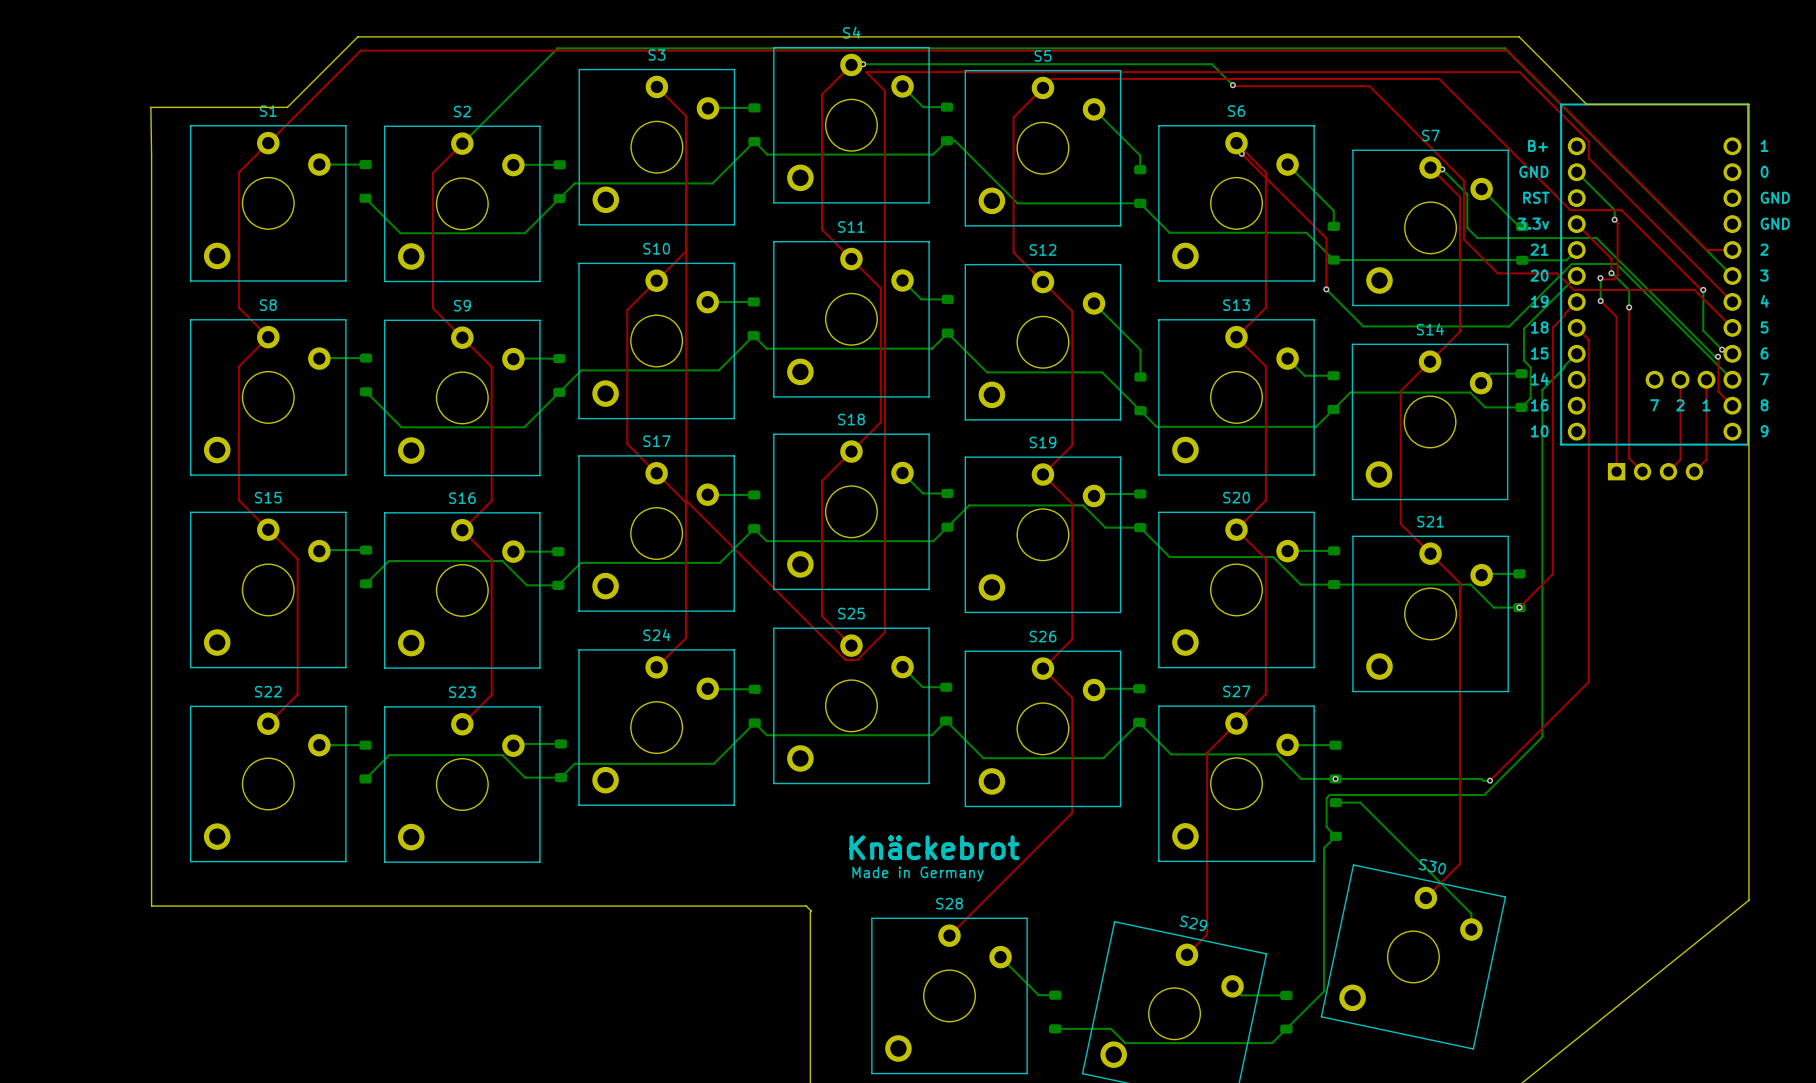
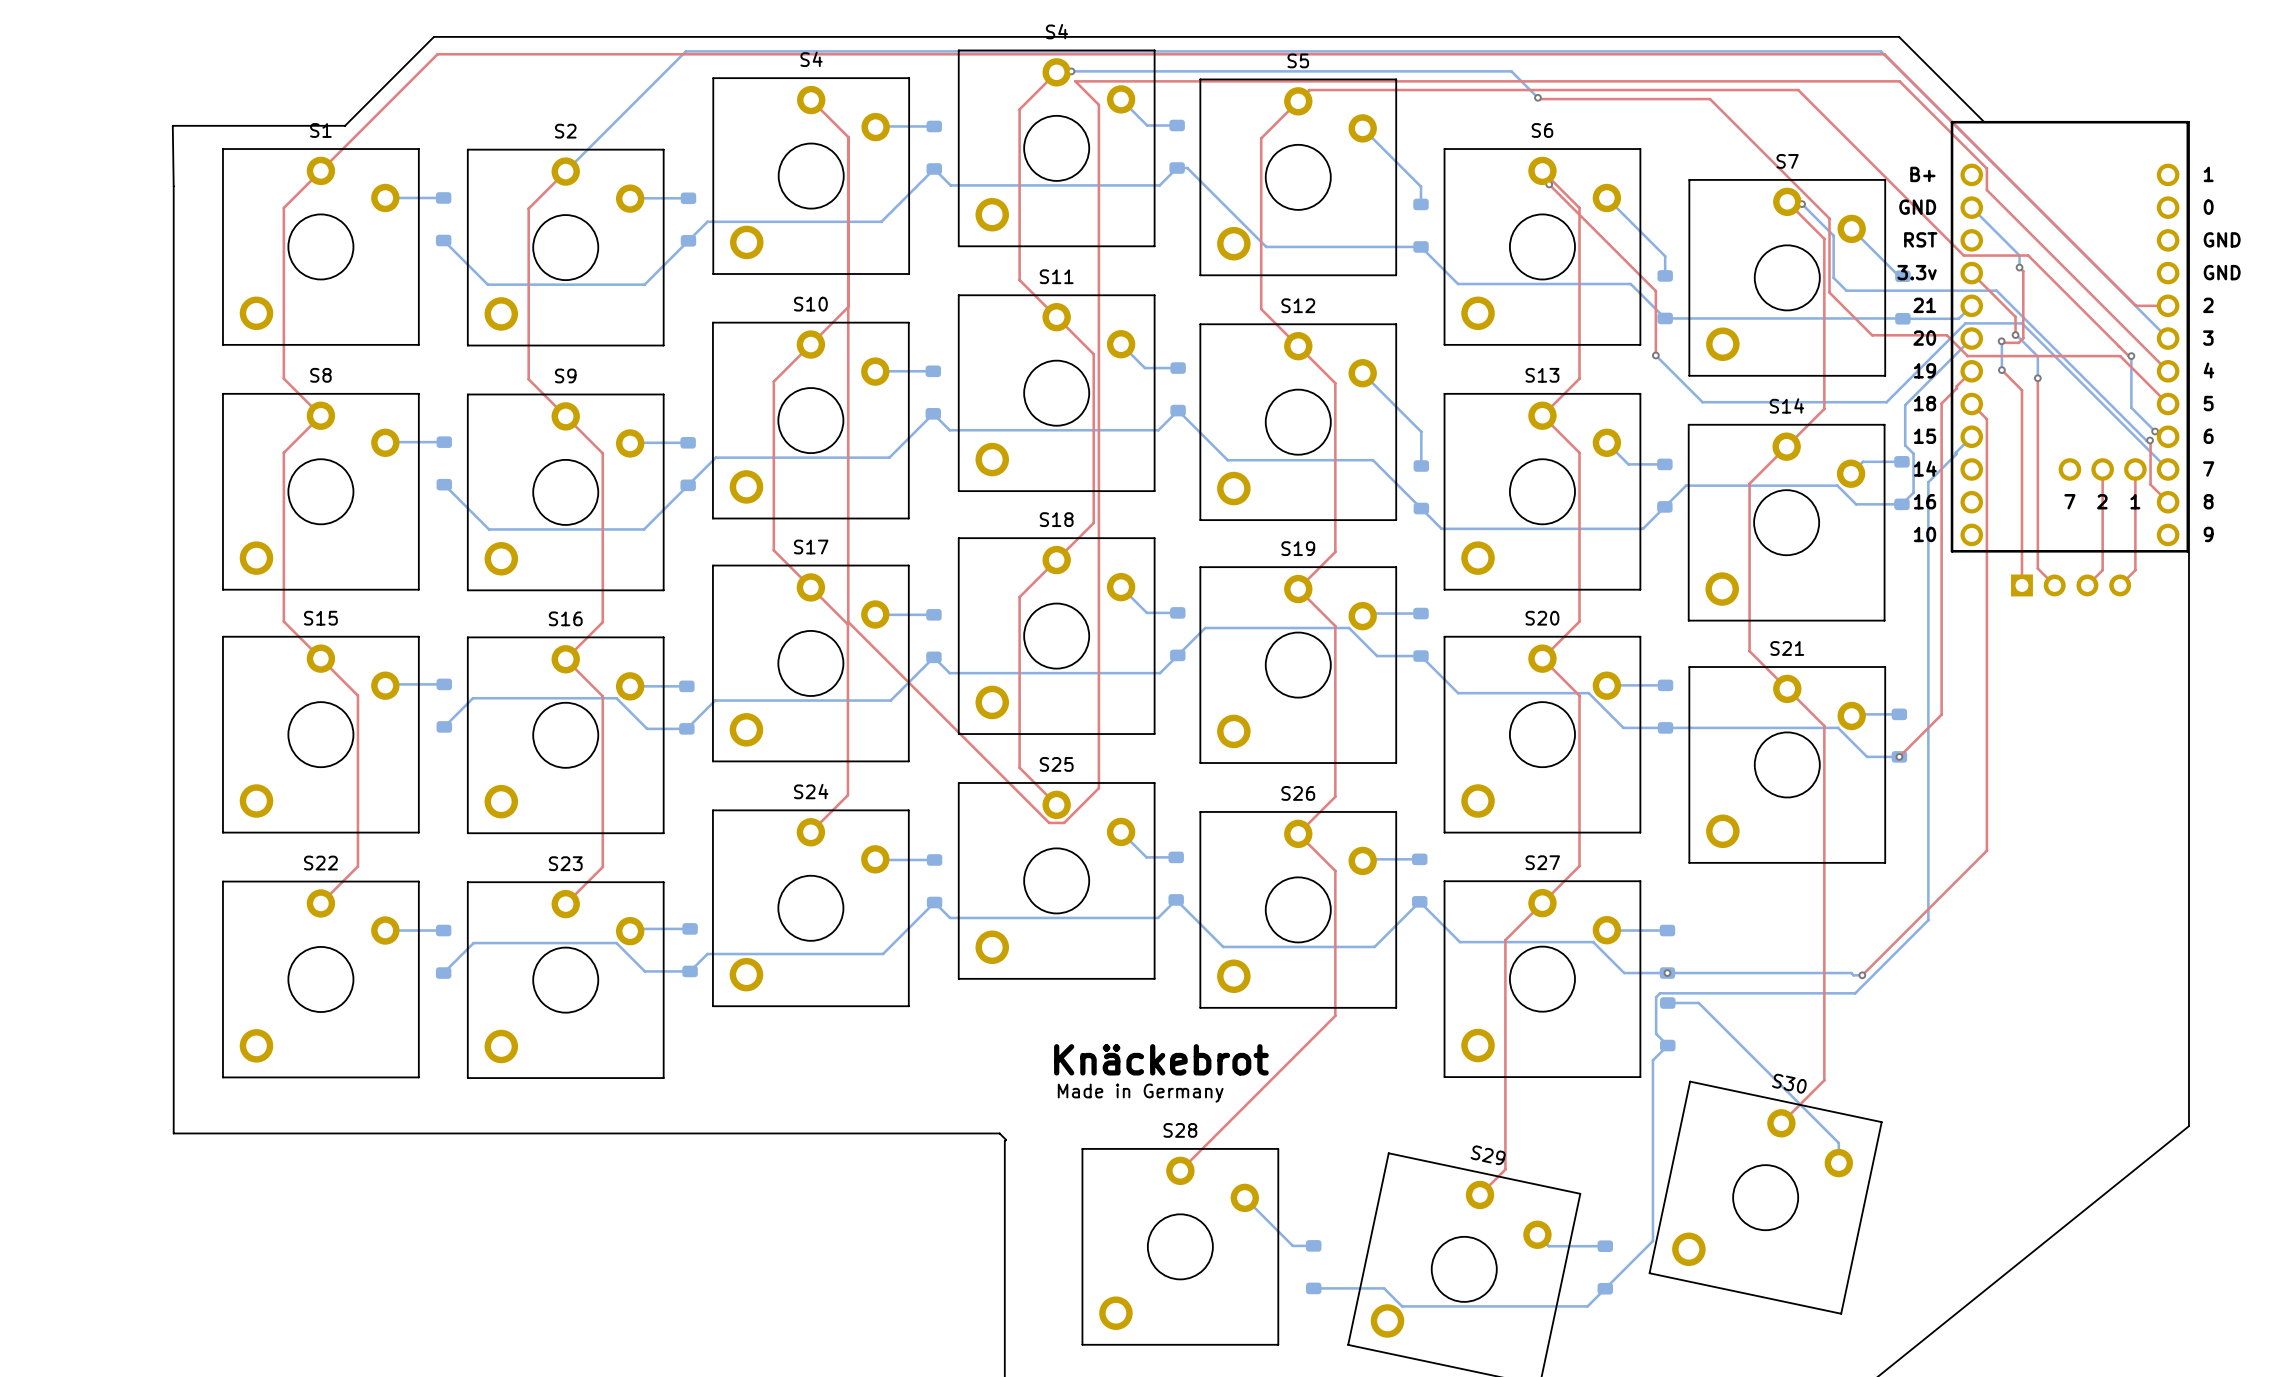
S3 name: S3 (656, 54) -> S4 (811, 59)

